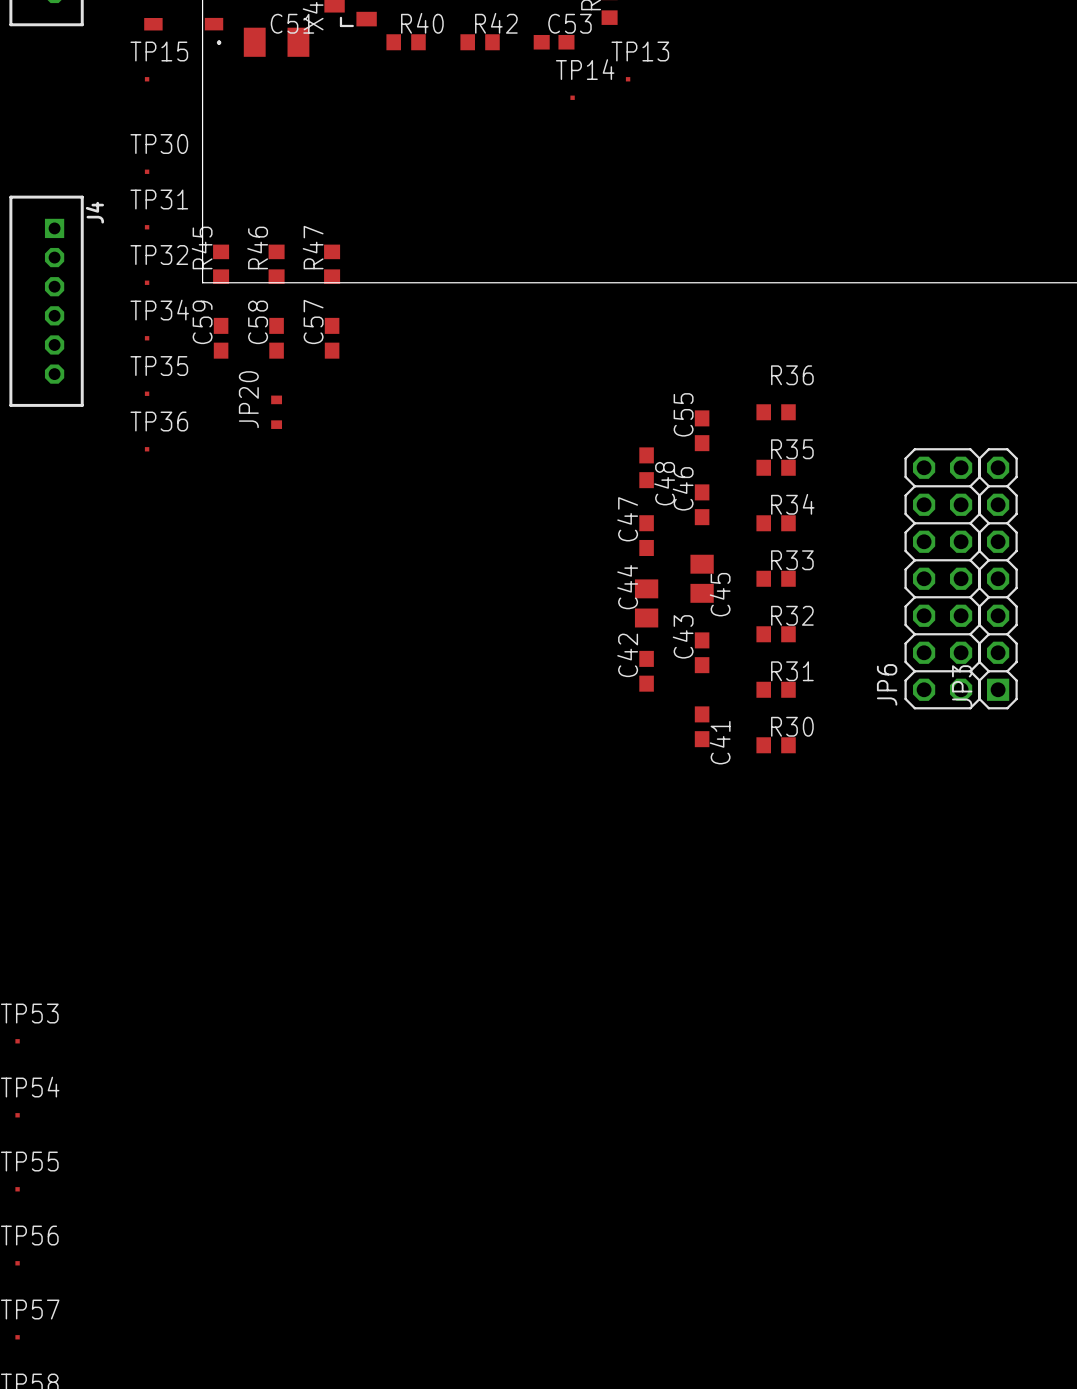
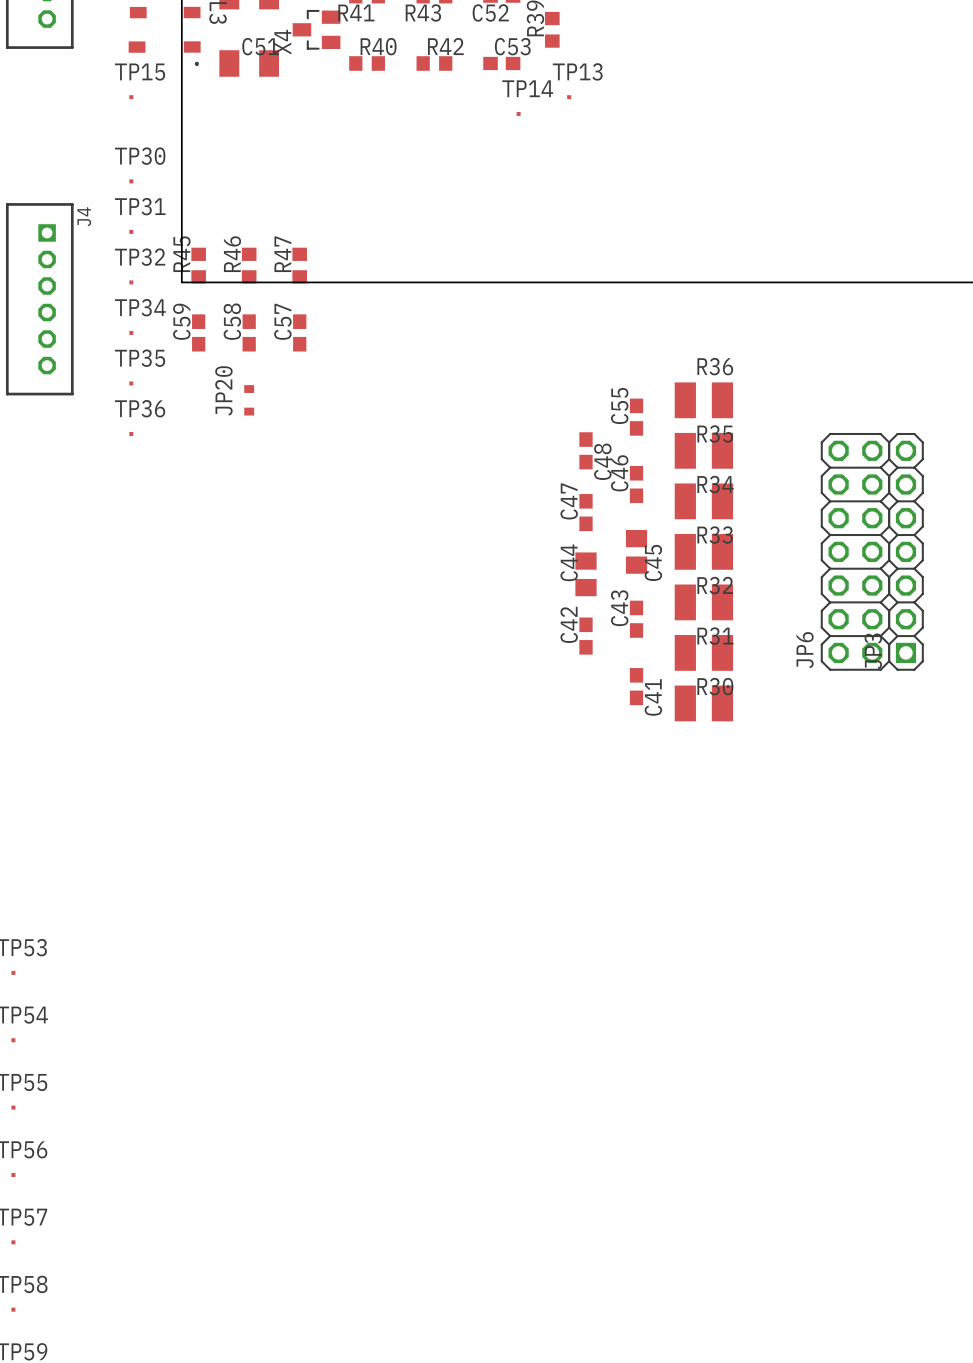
R36 footprint: [756, 404, 796, 421] -> [674, 382, 734, 419]
R35 footprint: [756, 459, 796, 476] -> [674, 432, 734, 469]
R34 footprint: [756, 515, 796, 532] -> [674, 483, 734, 520]
R33 footprint: [756, 570, 796, 587] -> [674, 533, 734, 570]
R32 footprint: [756, 626, 796, 643] -> [674, 584, 734, 621]
R31 footprint: [756, 681, 796, 698] -> [674, 635, 734, 671]
R30 footprint: [756, 737, 796, 754] -> [674, 685, 734, 722]

